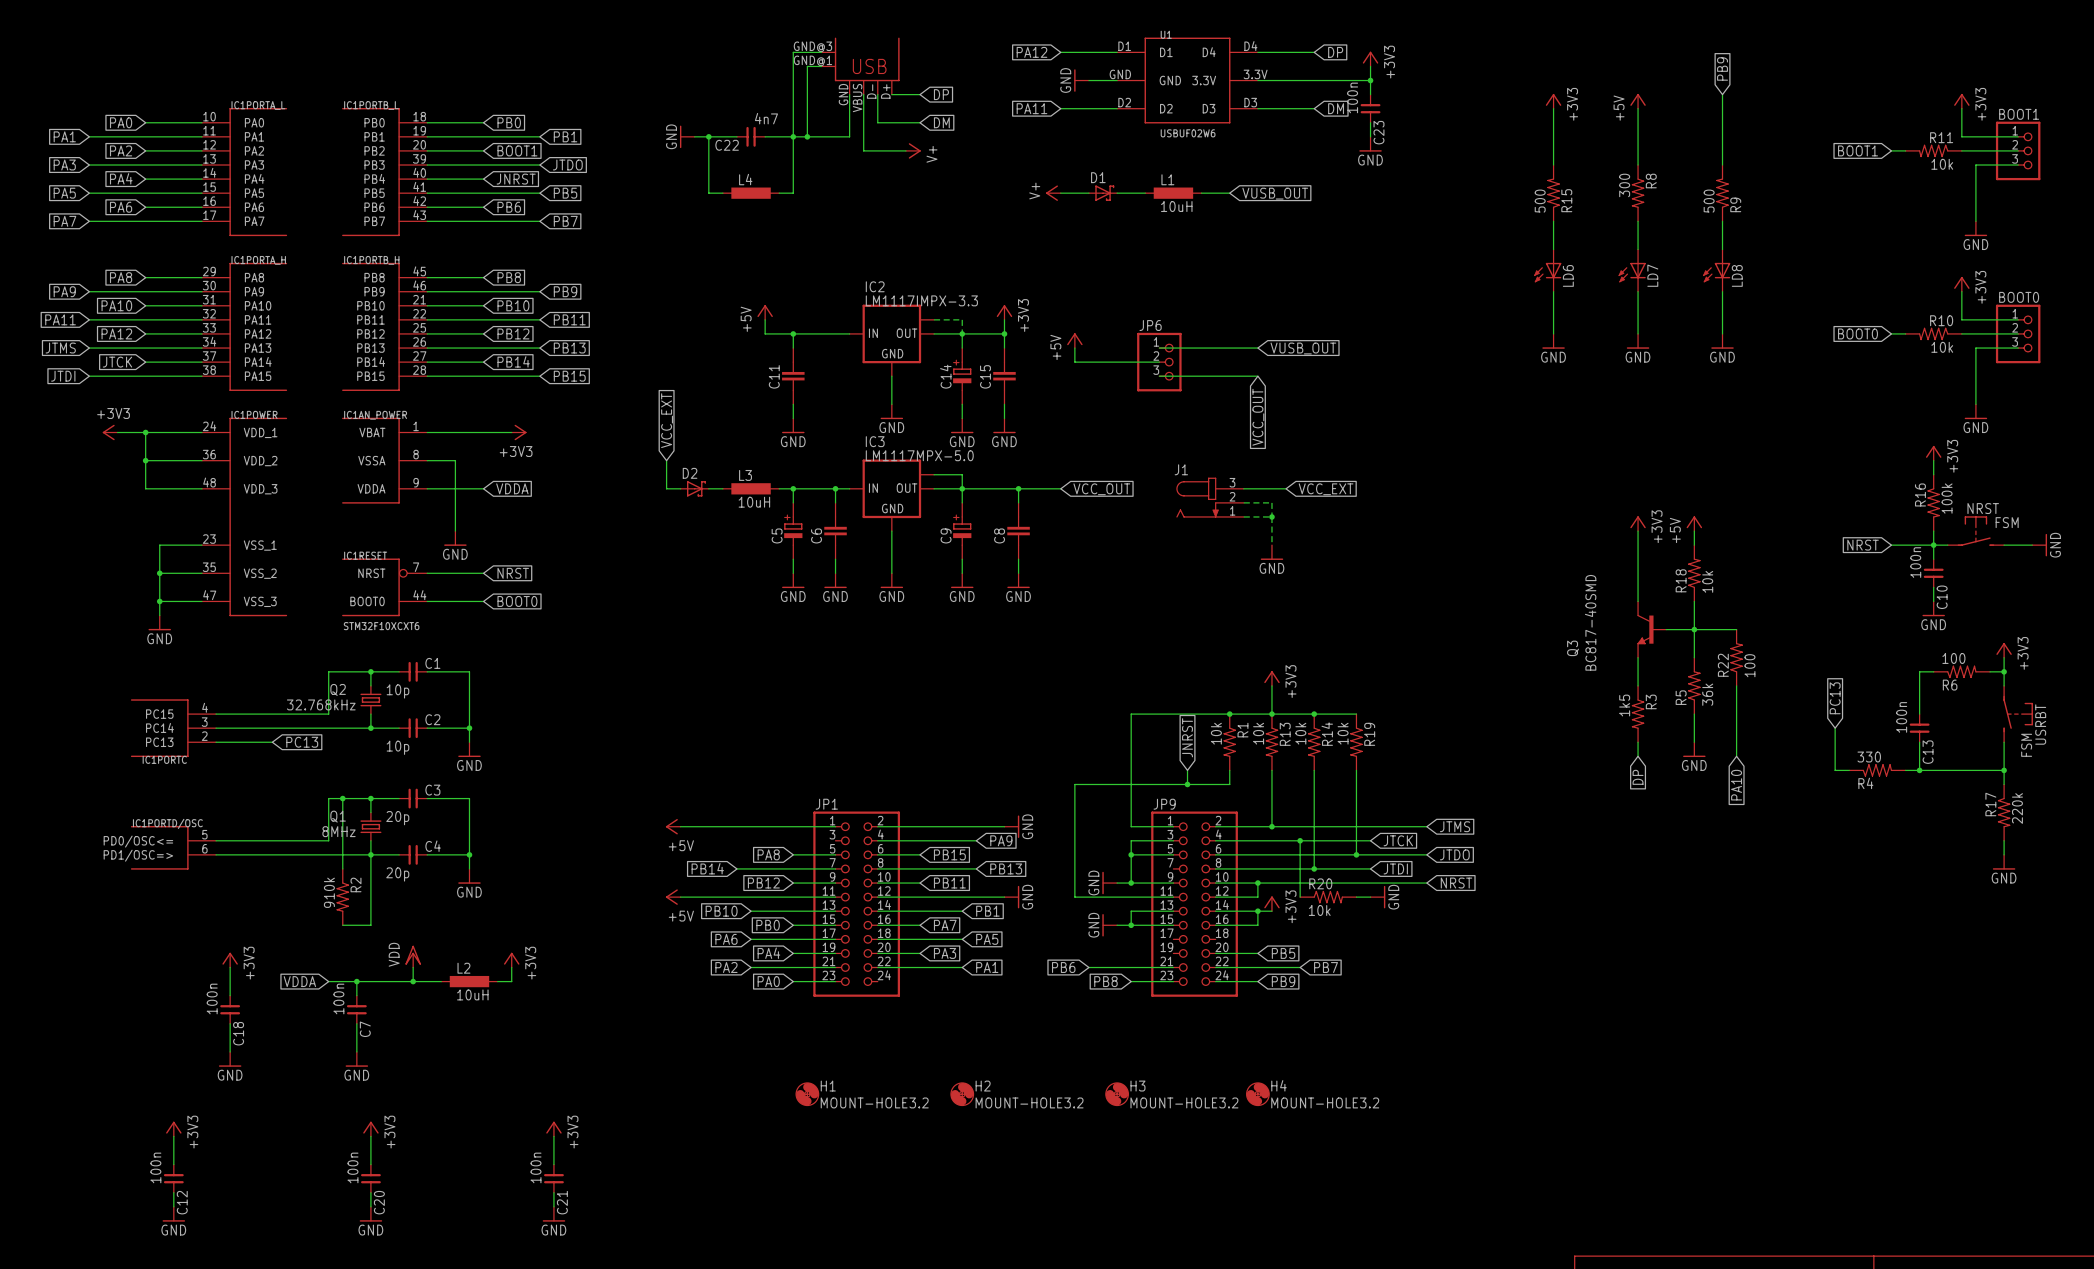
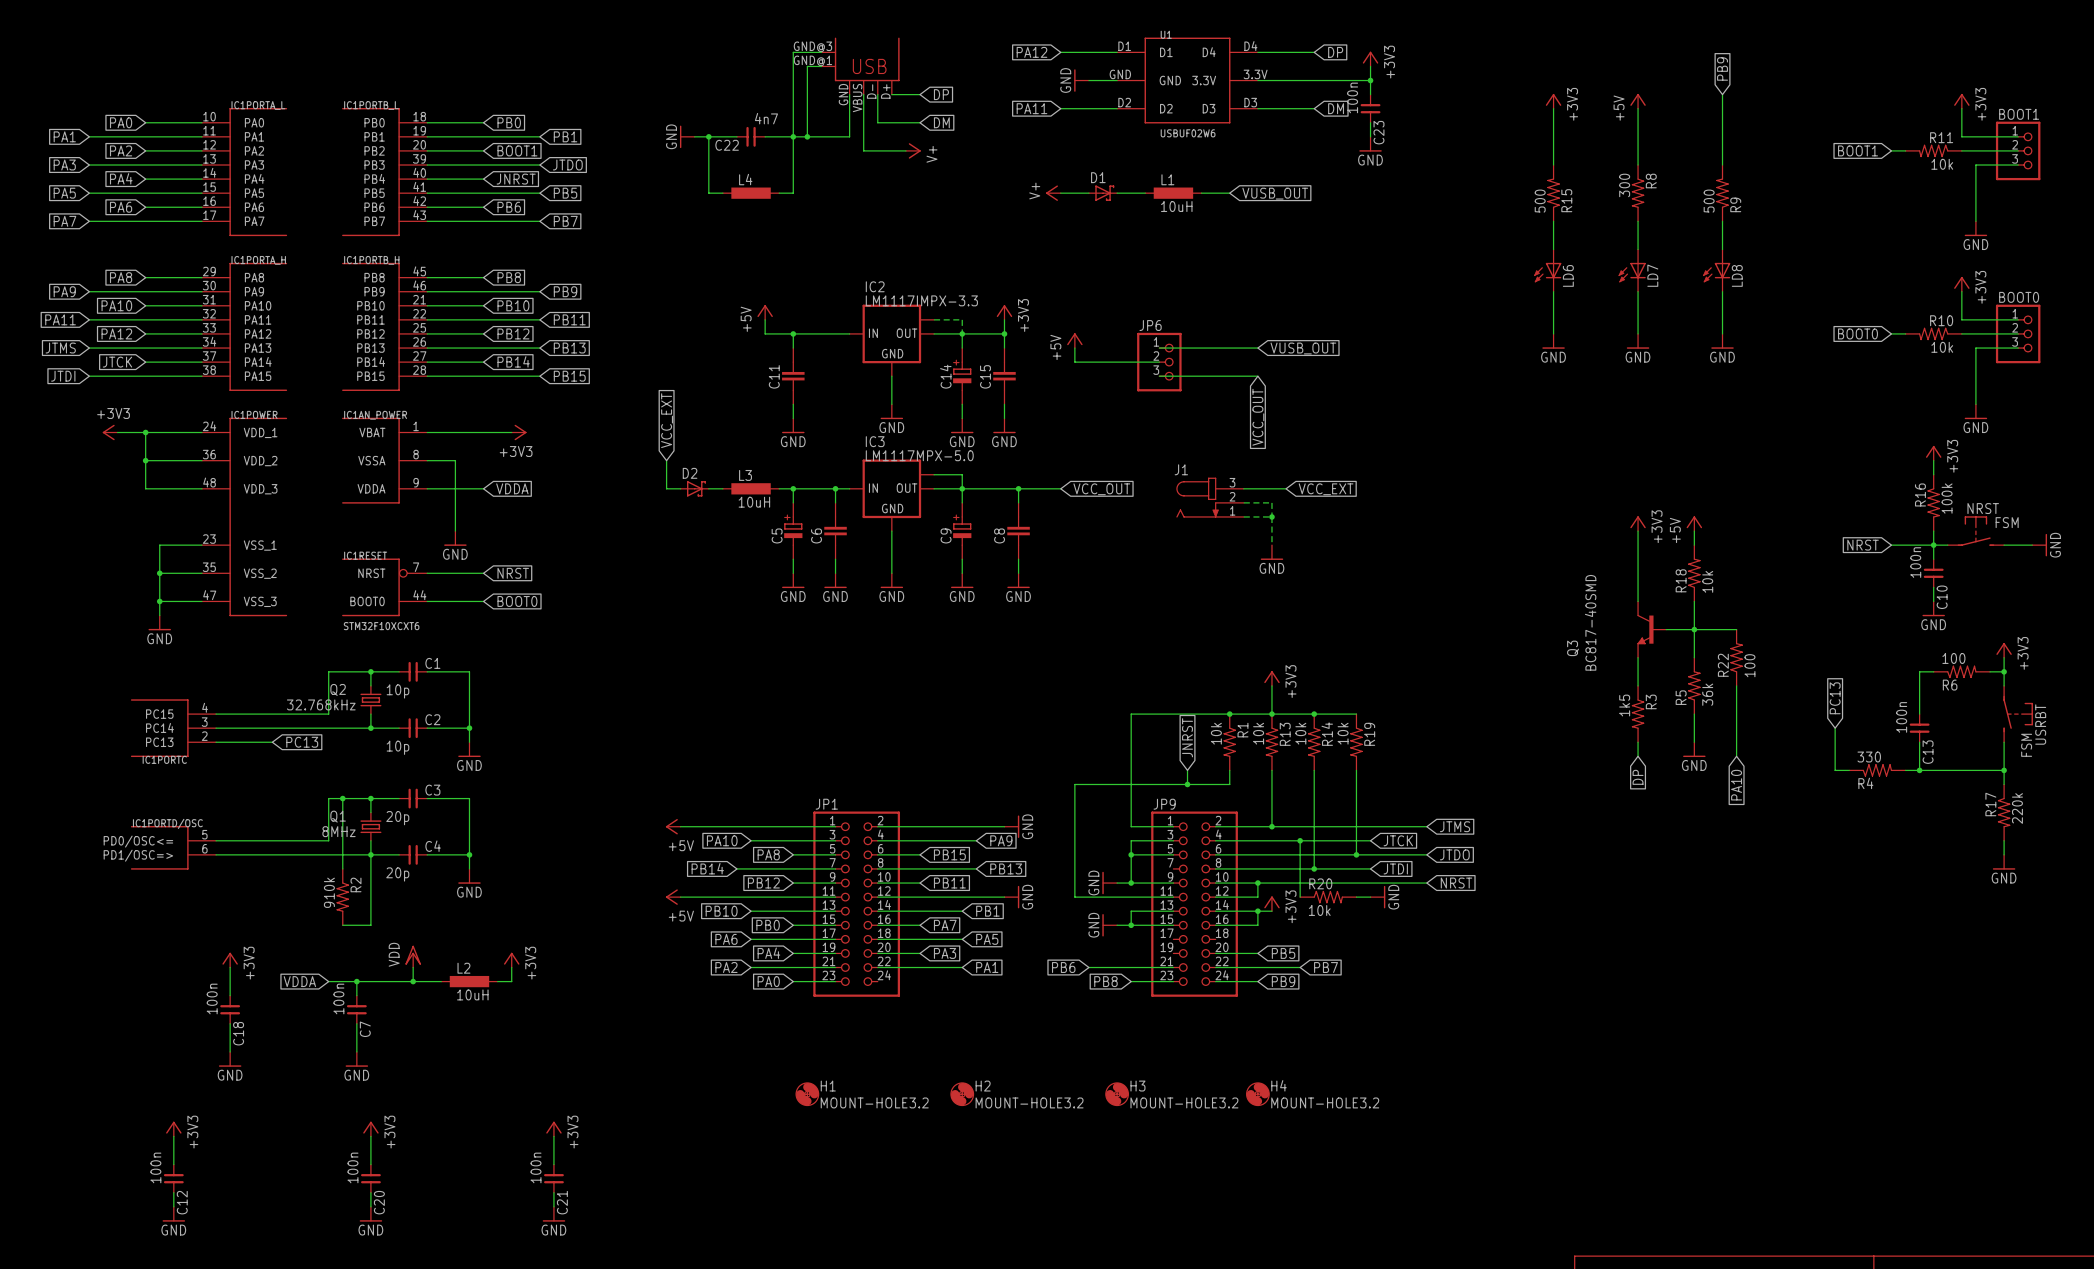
global label: none -> PA10 (722, 840)
wire: none -> (751, 840) (835, 840)

